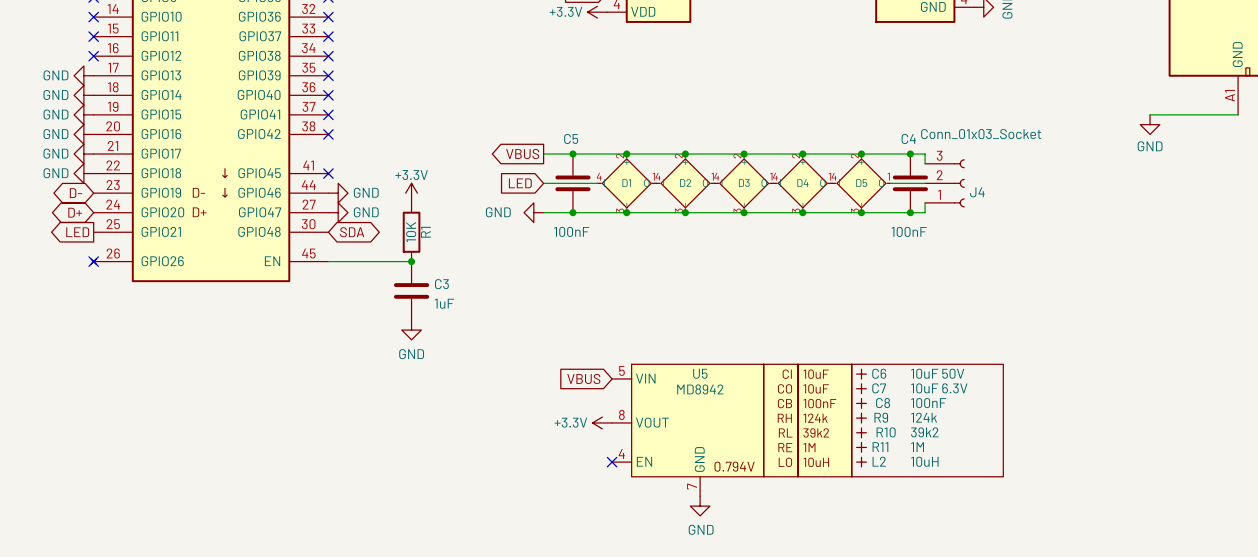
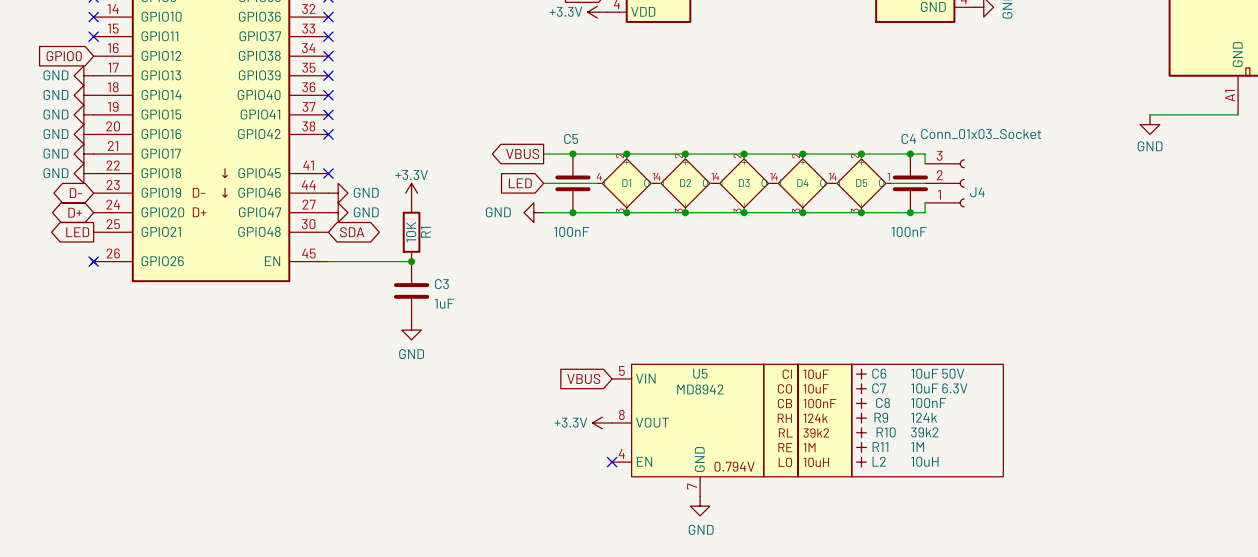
global label: none -> GPIO0 (64, 56)
no-connect mark: (93, 56) -> none

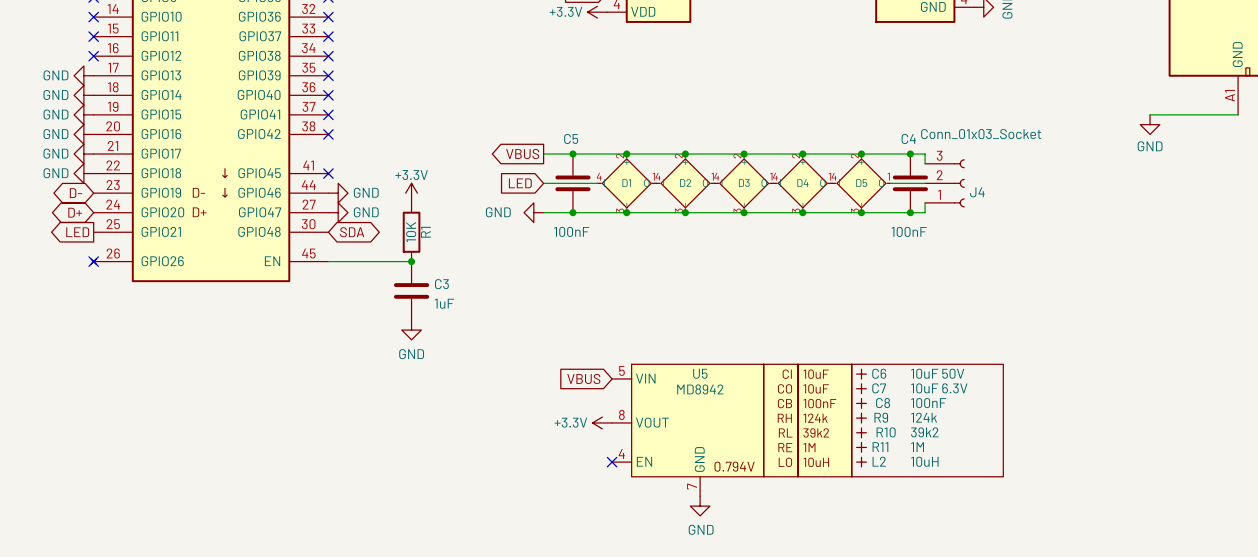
global label: GPIO0 (64, 56) -> none
no-connect mark: none -> (93, 56)

